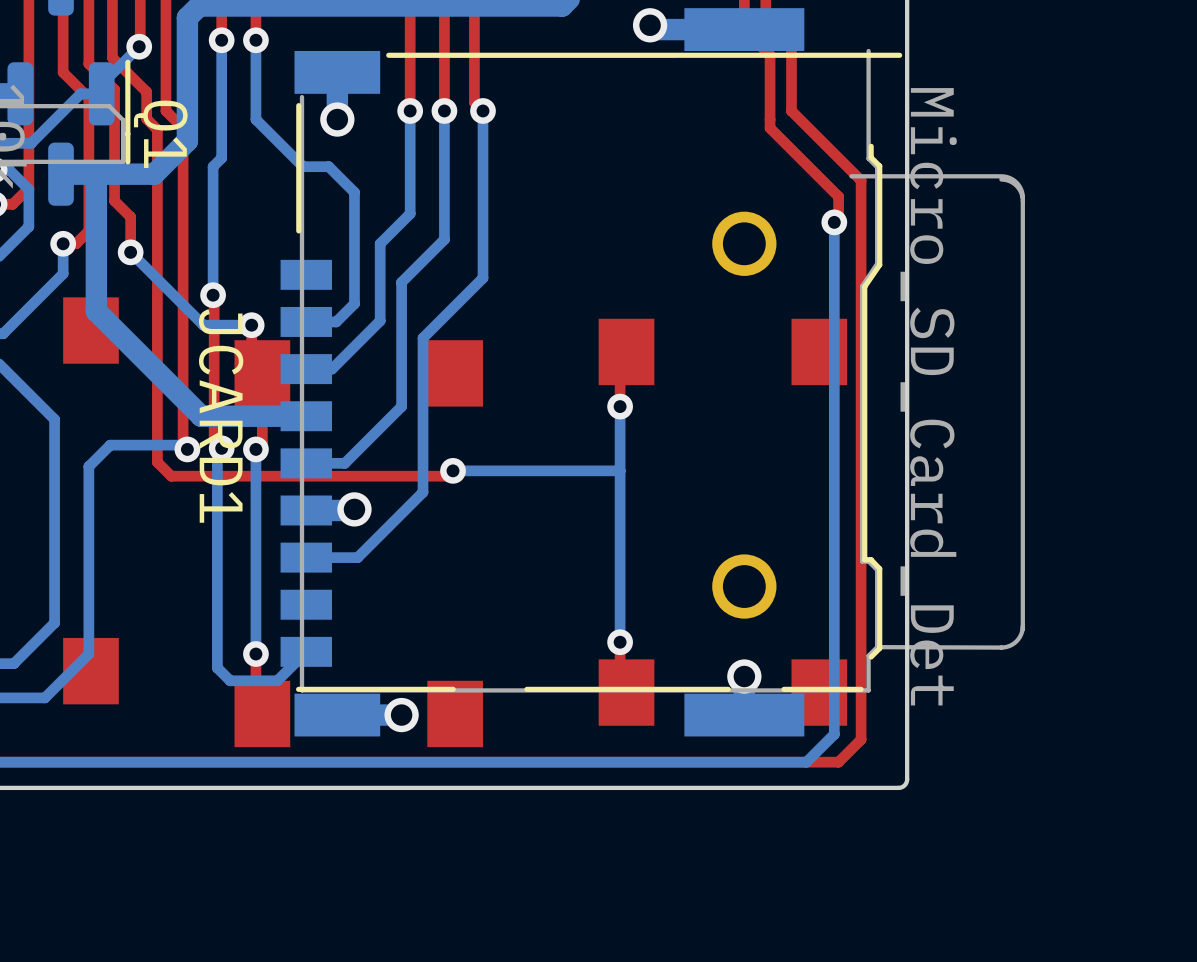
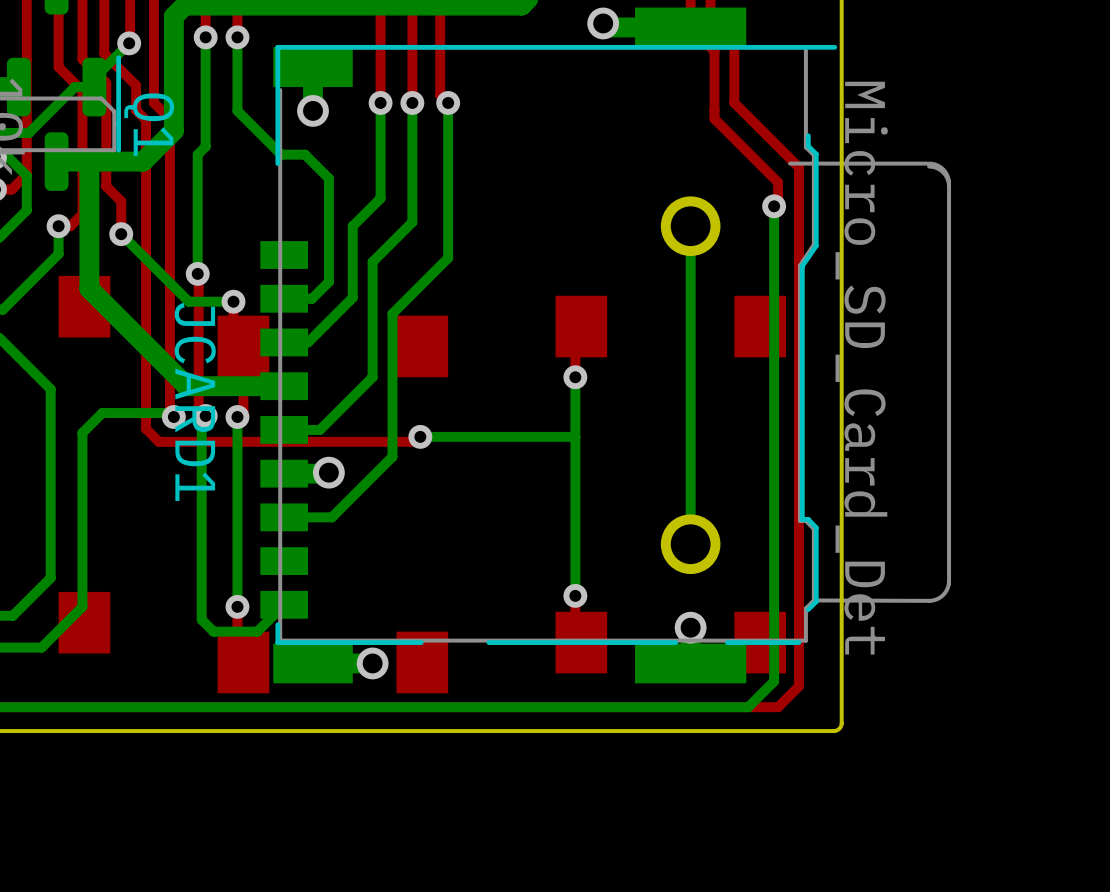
JCARD1 footprint: [280, 8, 1025, 737] -> [260, 7, 952, 684]
bottom track: none -> (690, 226) (690, 544)

